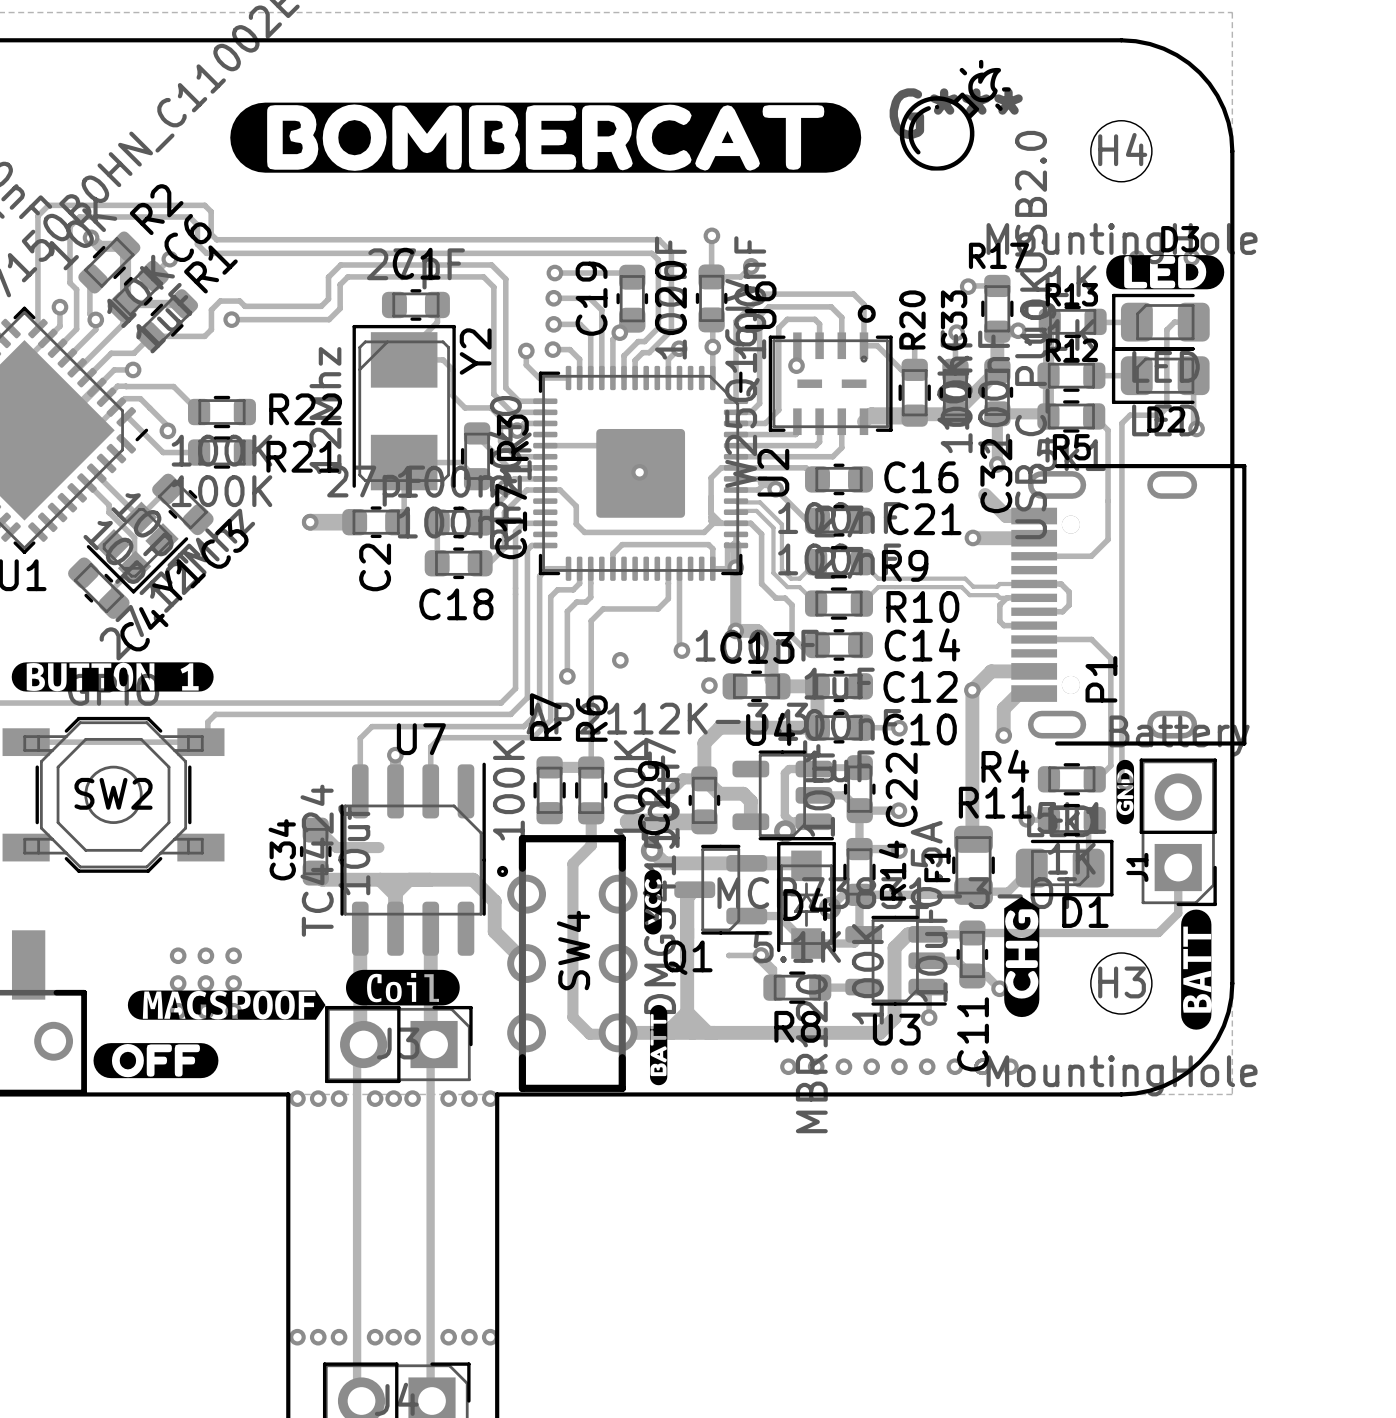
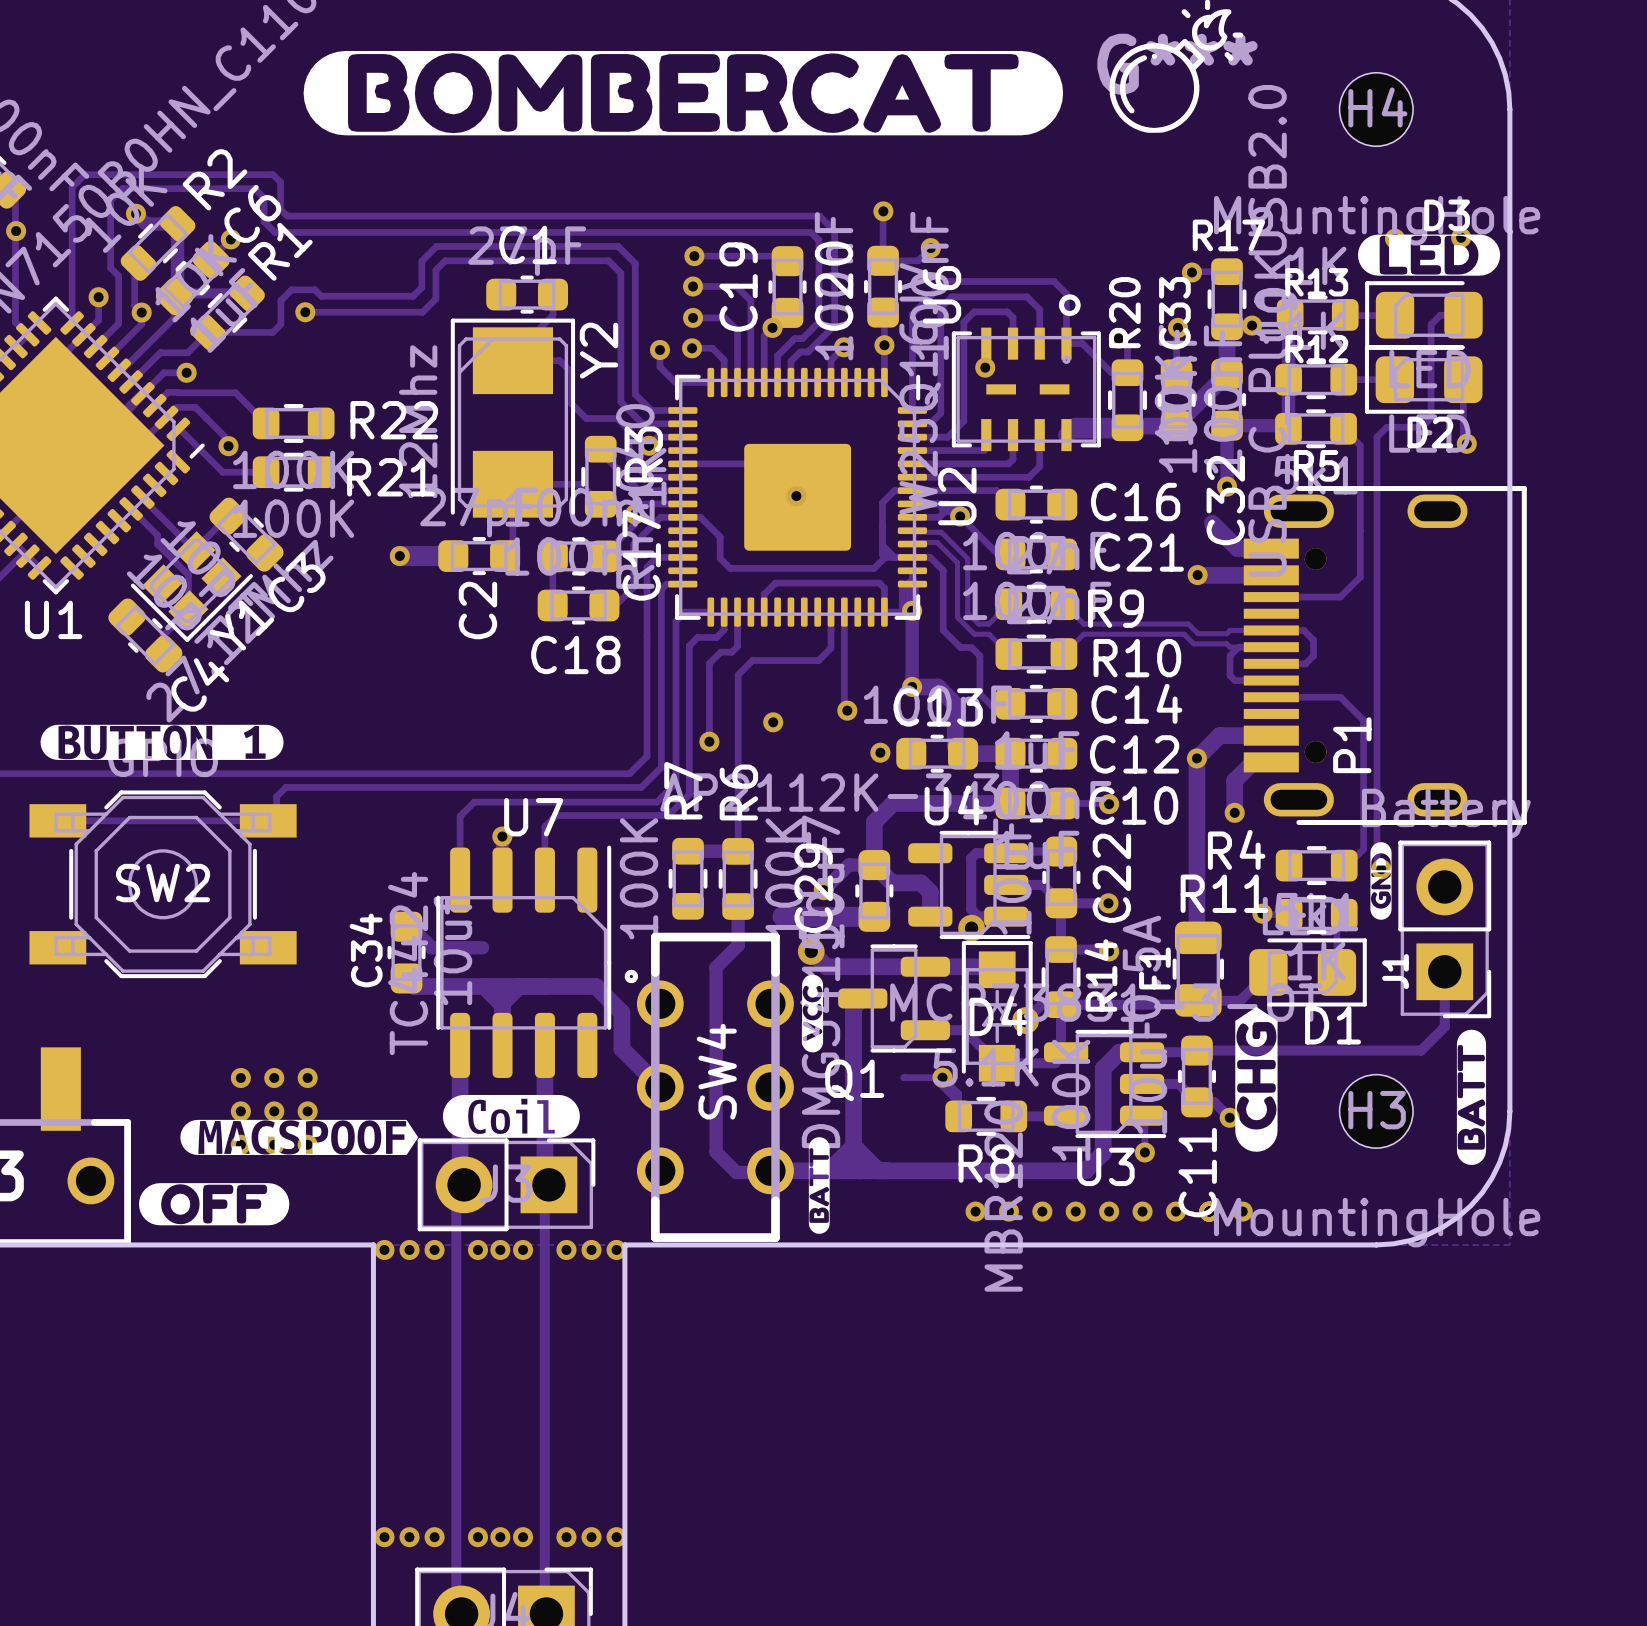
drawing shape: [1181, 909, 1212, 1030] -> [1456, 1029, 1487, 1166]

